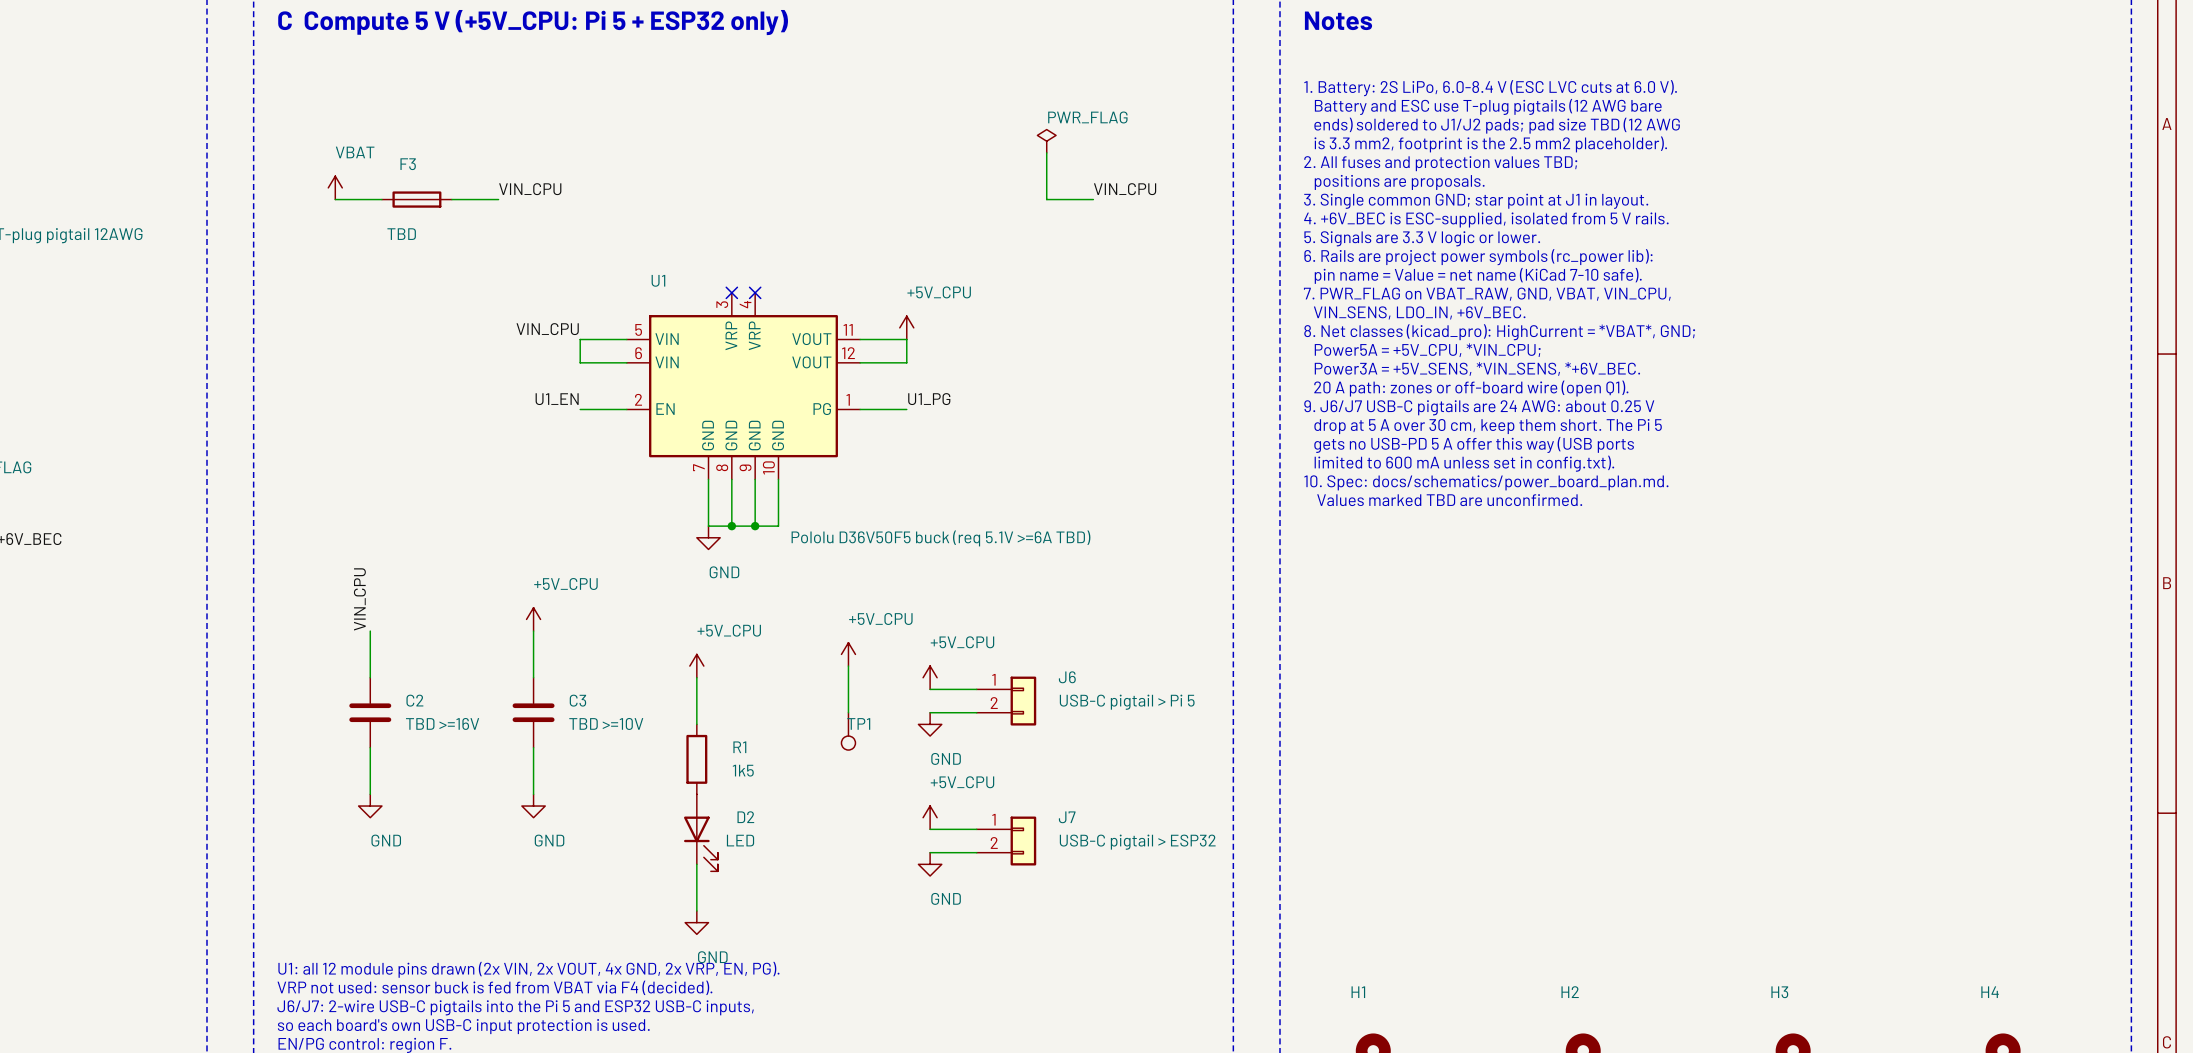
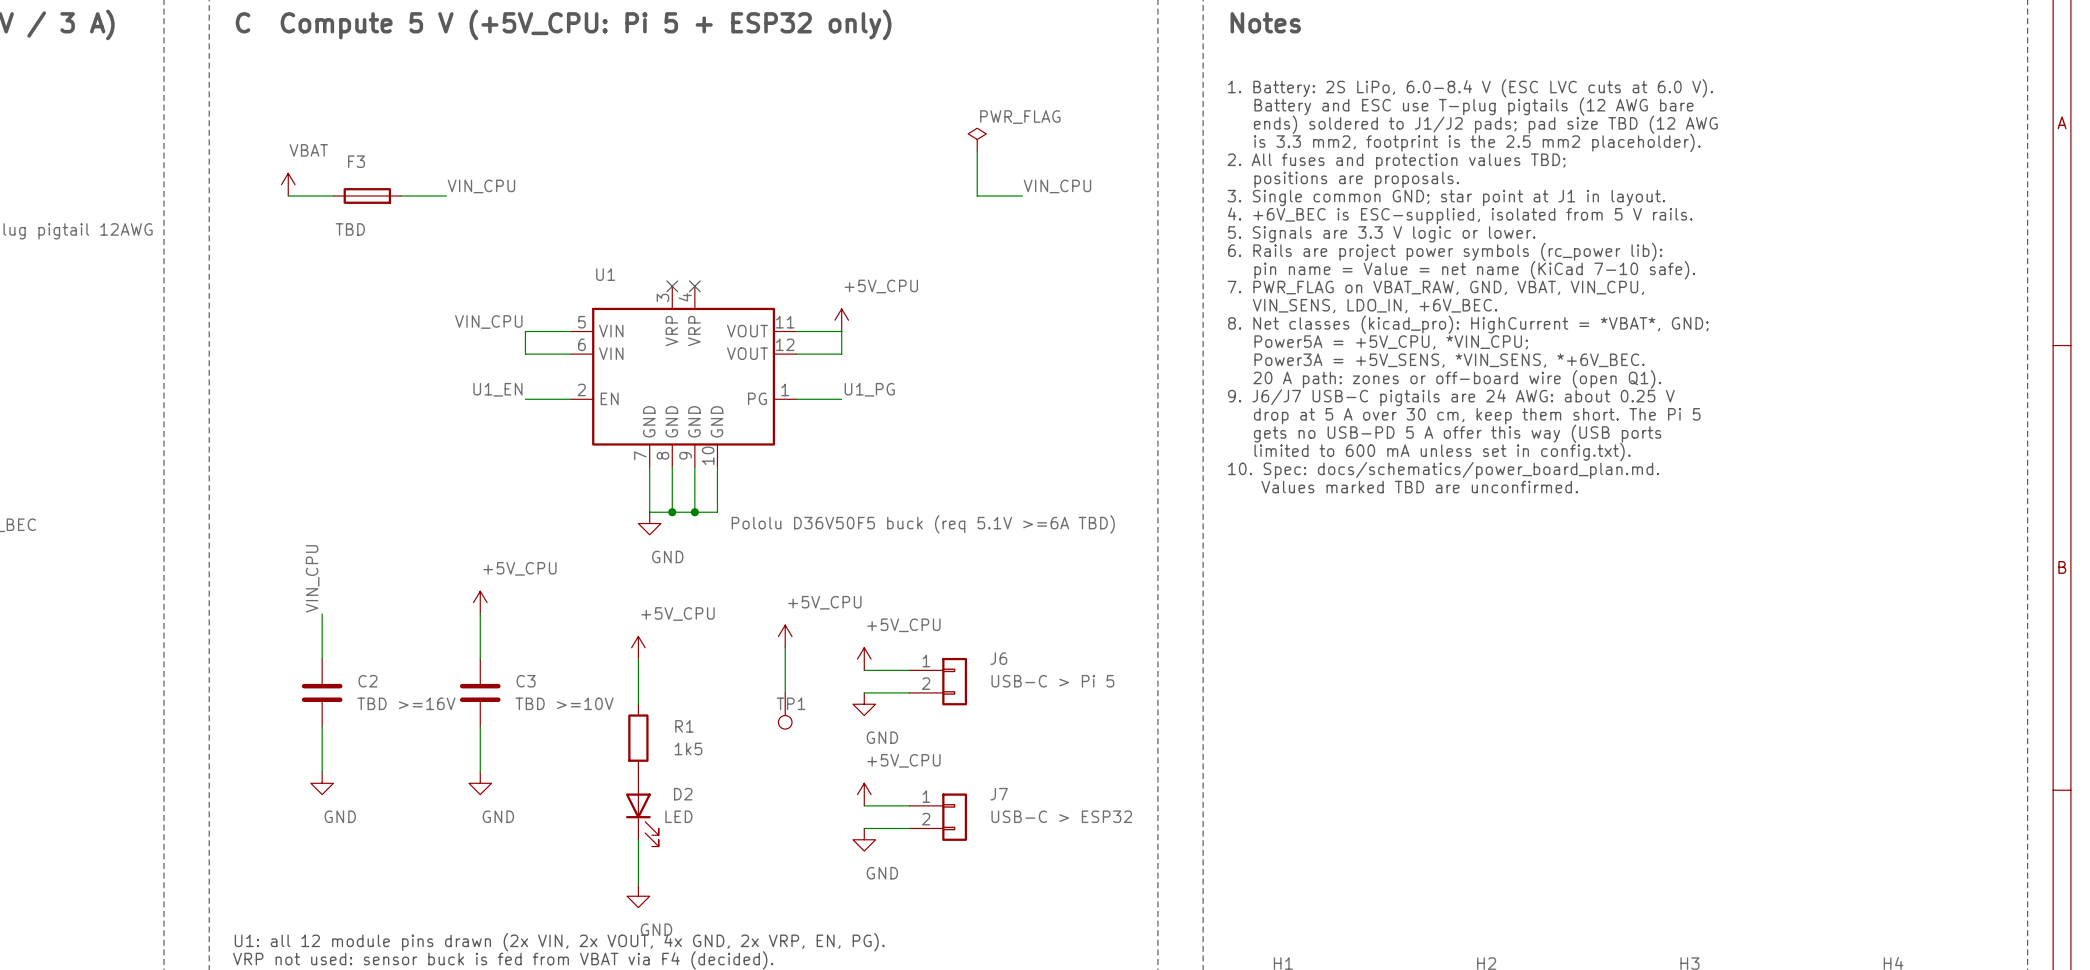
J6 value: USB-C pigtail > Pi 5 (1127, 702) -> USB-C > Pi 5 (1052, 681)
J7 value: USB-C pigtail > ESP32 (1137, 842) -> USB-C > ESP32 (1061, 816)

